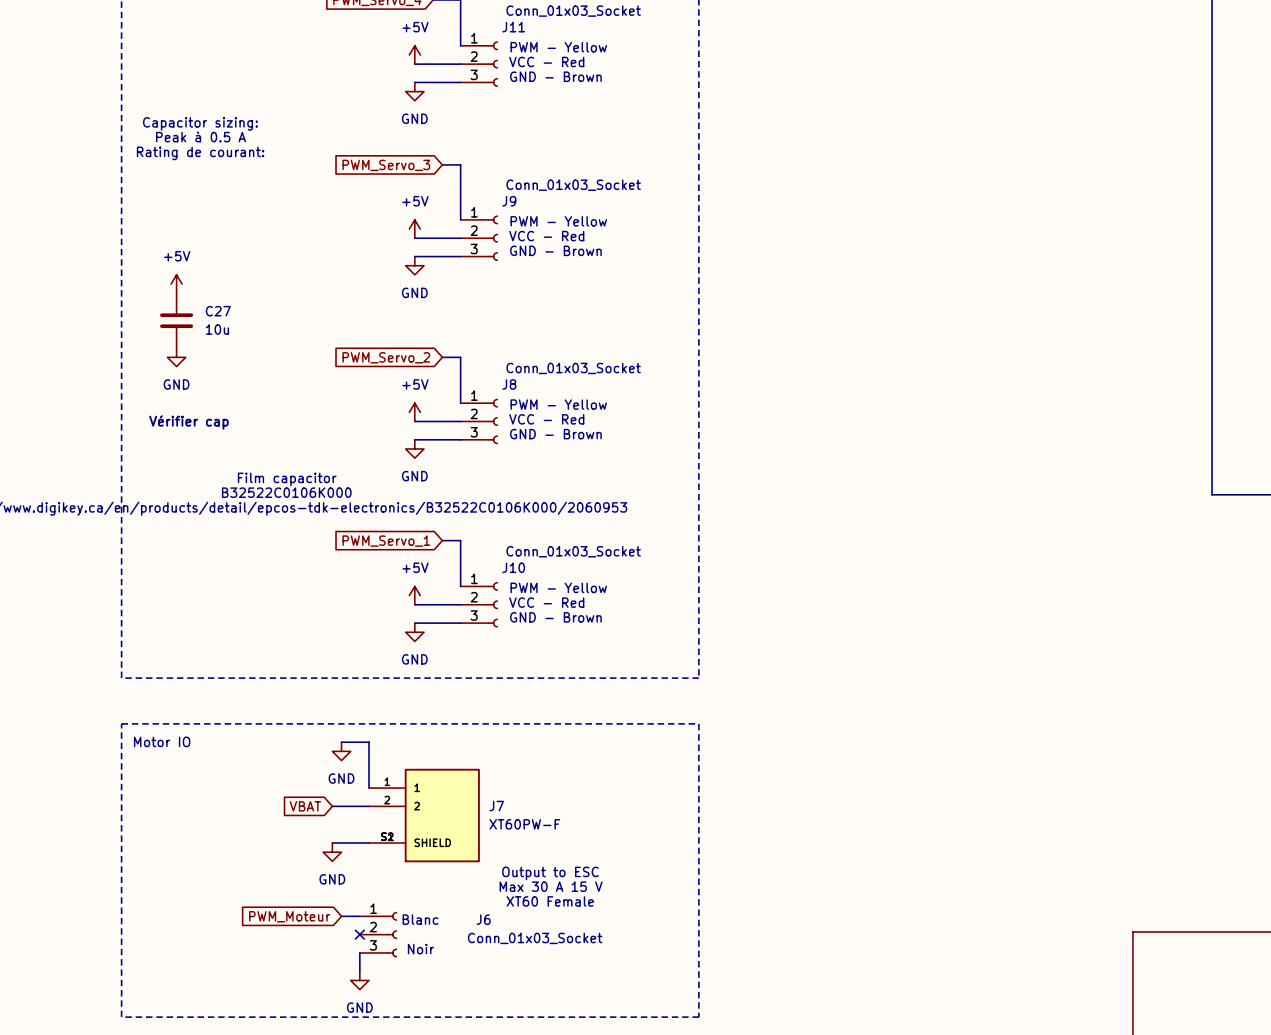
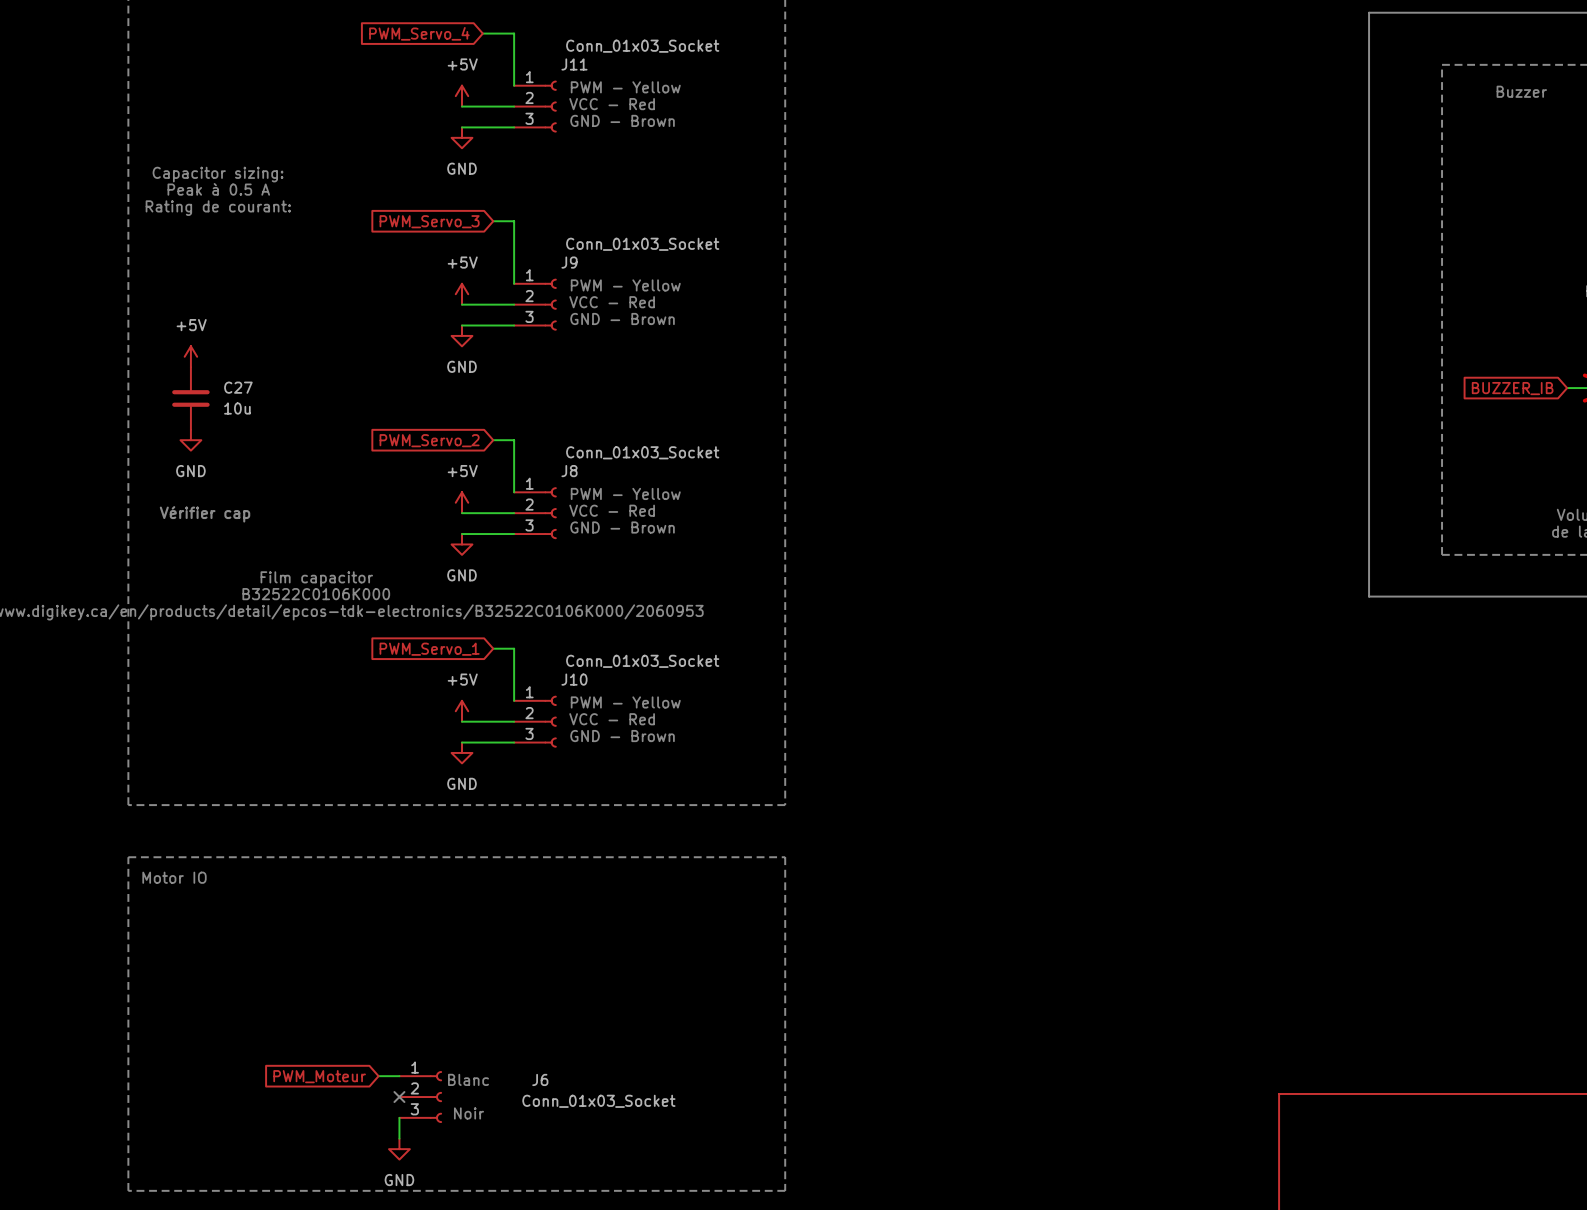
wire: (341, 742) (369, 742) (369, 788) -> none
power symbol: GND (341, 751) -> none
global label: VBAT (305, 806) -> none
wire: (332, 806) (369, 806) -> none
J7: XT60PW-F (424, 815) -> none
wire: (332, 843) (369, 843) -> none
power symbol: GND (332, 852) -> none
text: Output to ESC (550, 873) -> none
text: Max 30 A 15 V (551, 886) -> none
text: XT60 Female (550, 901) -> none

